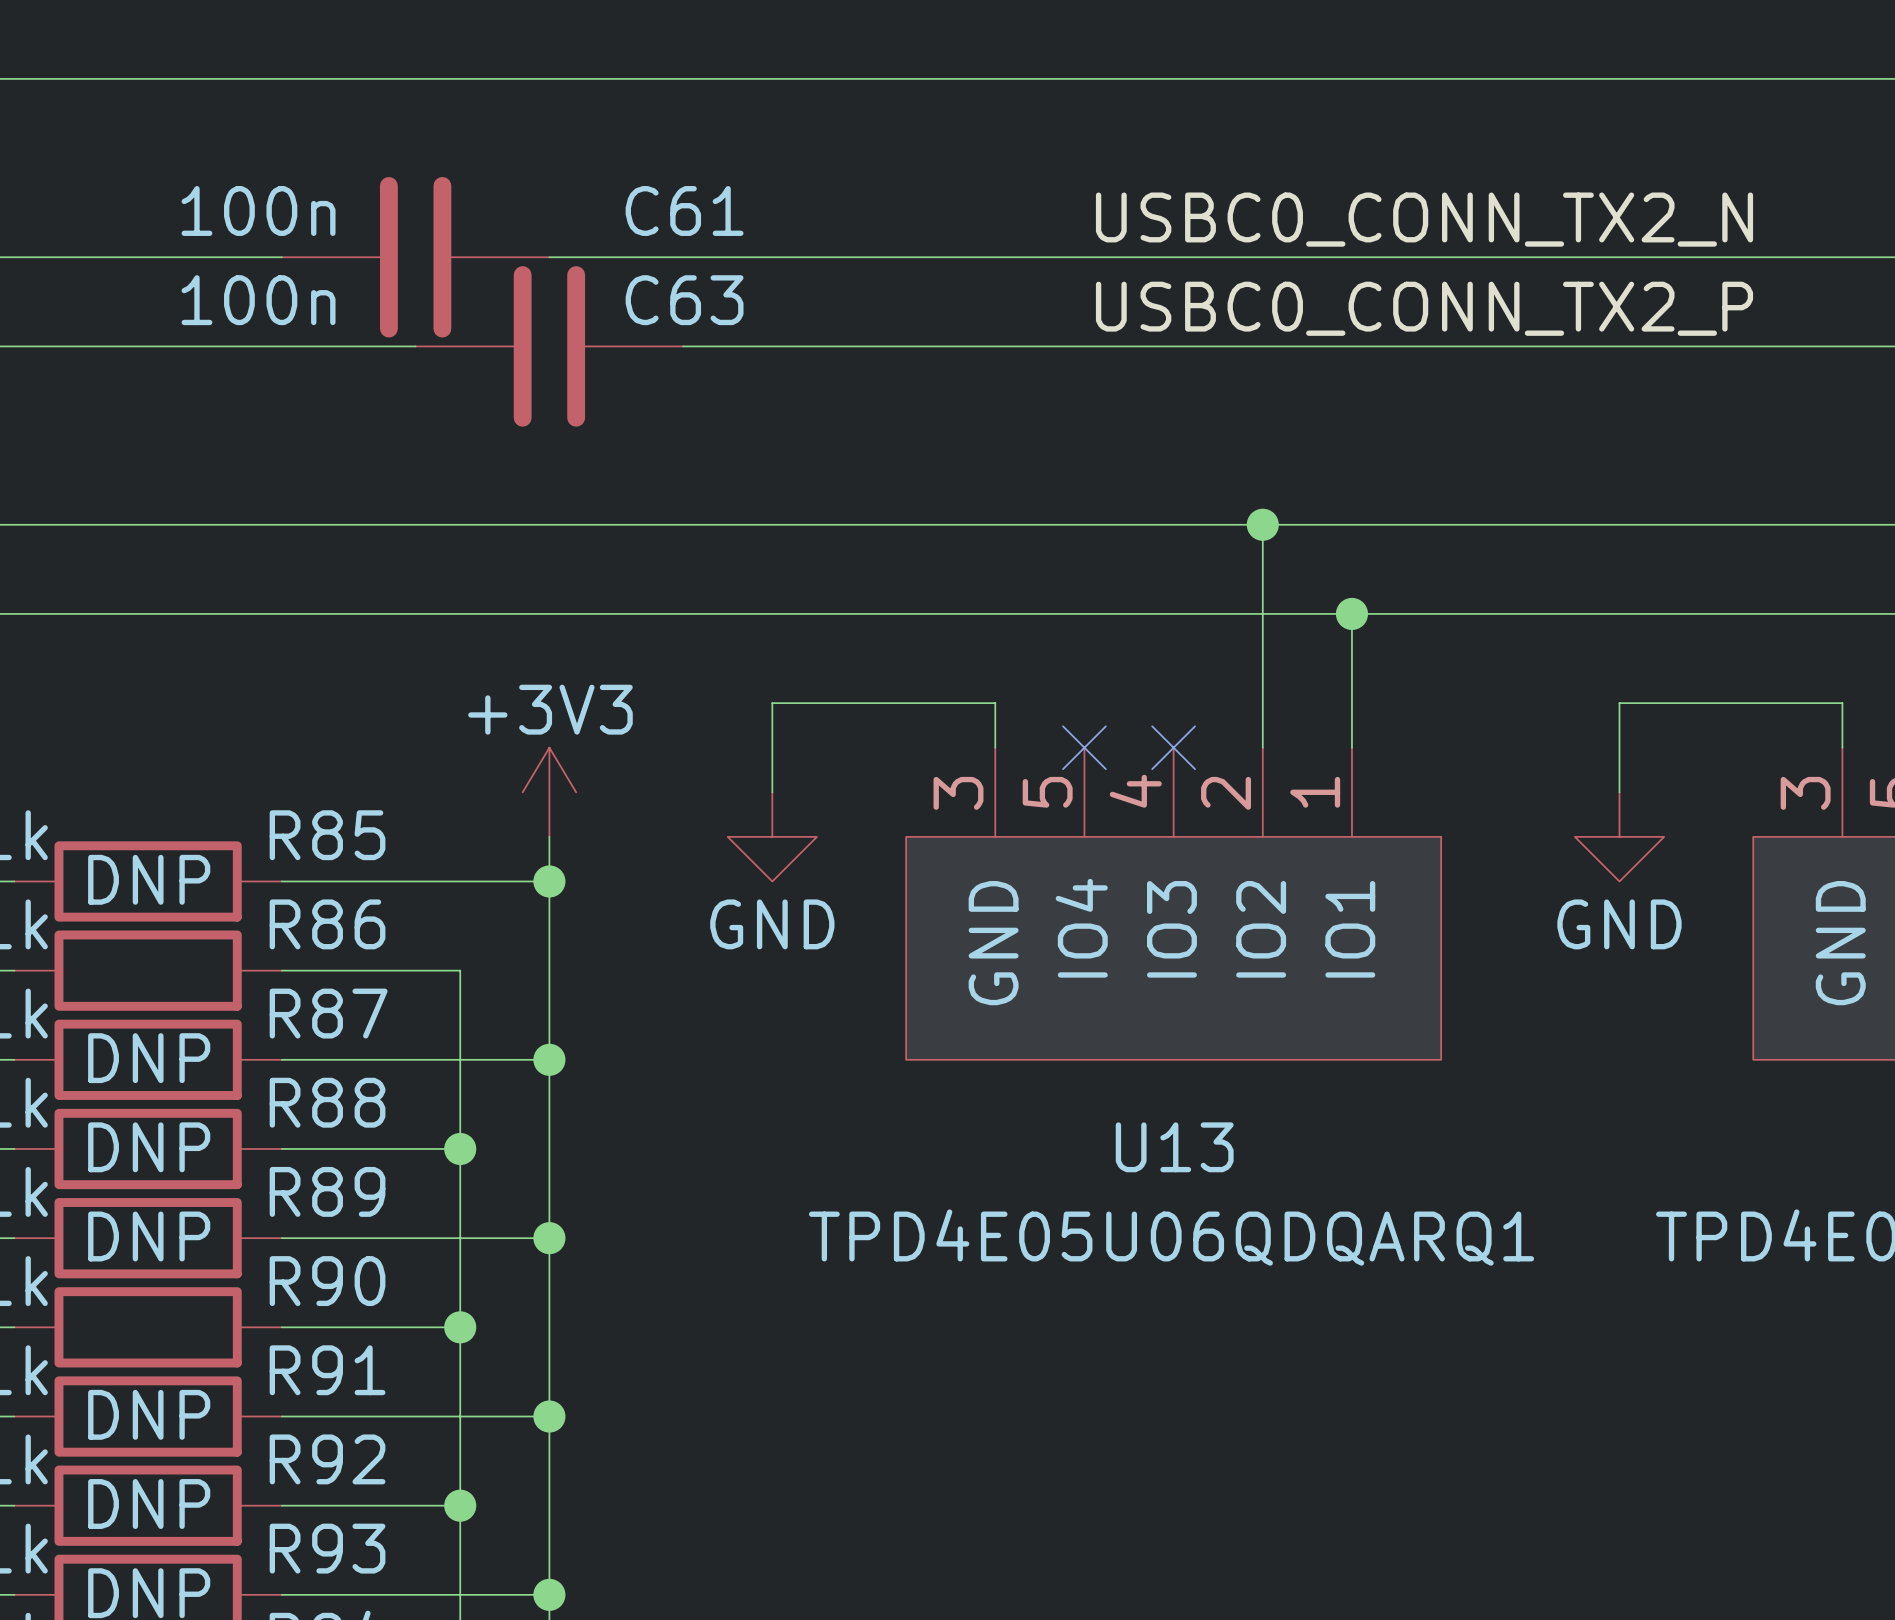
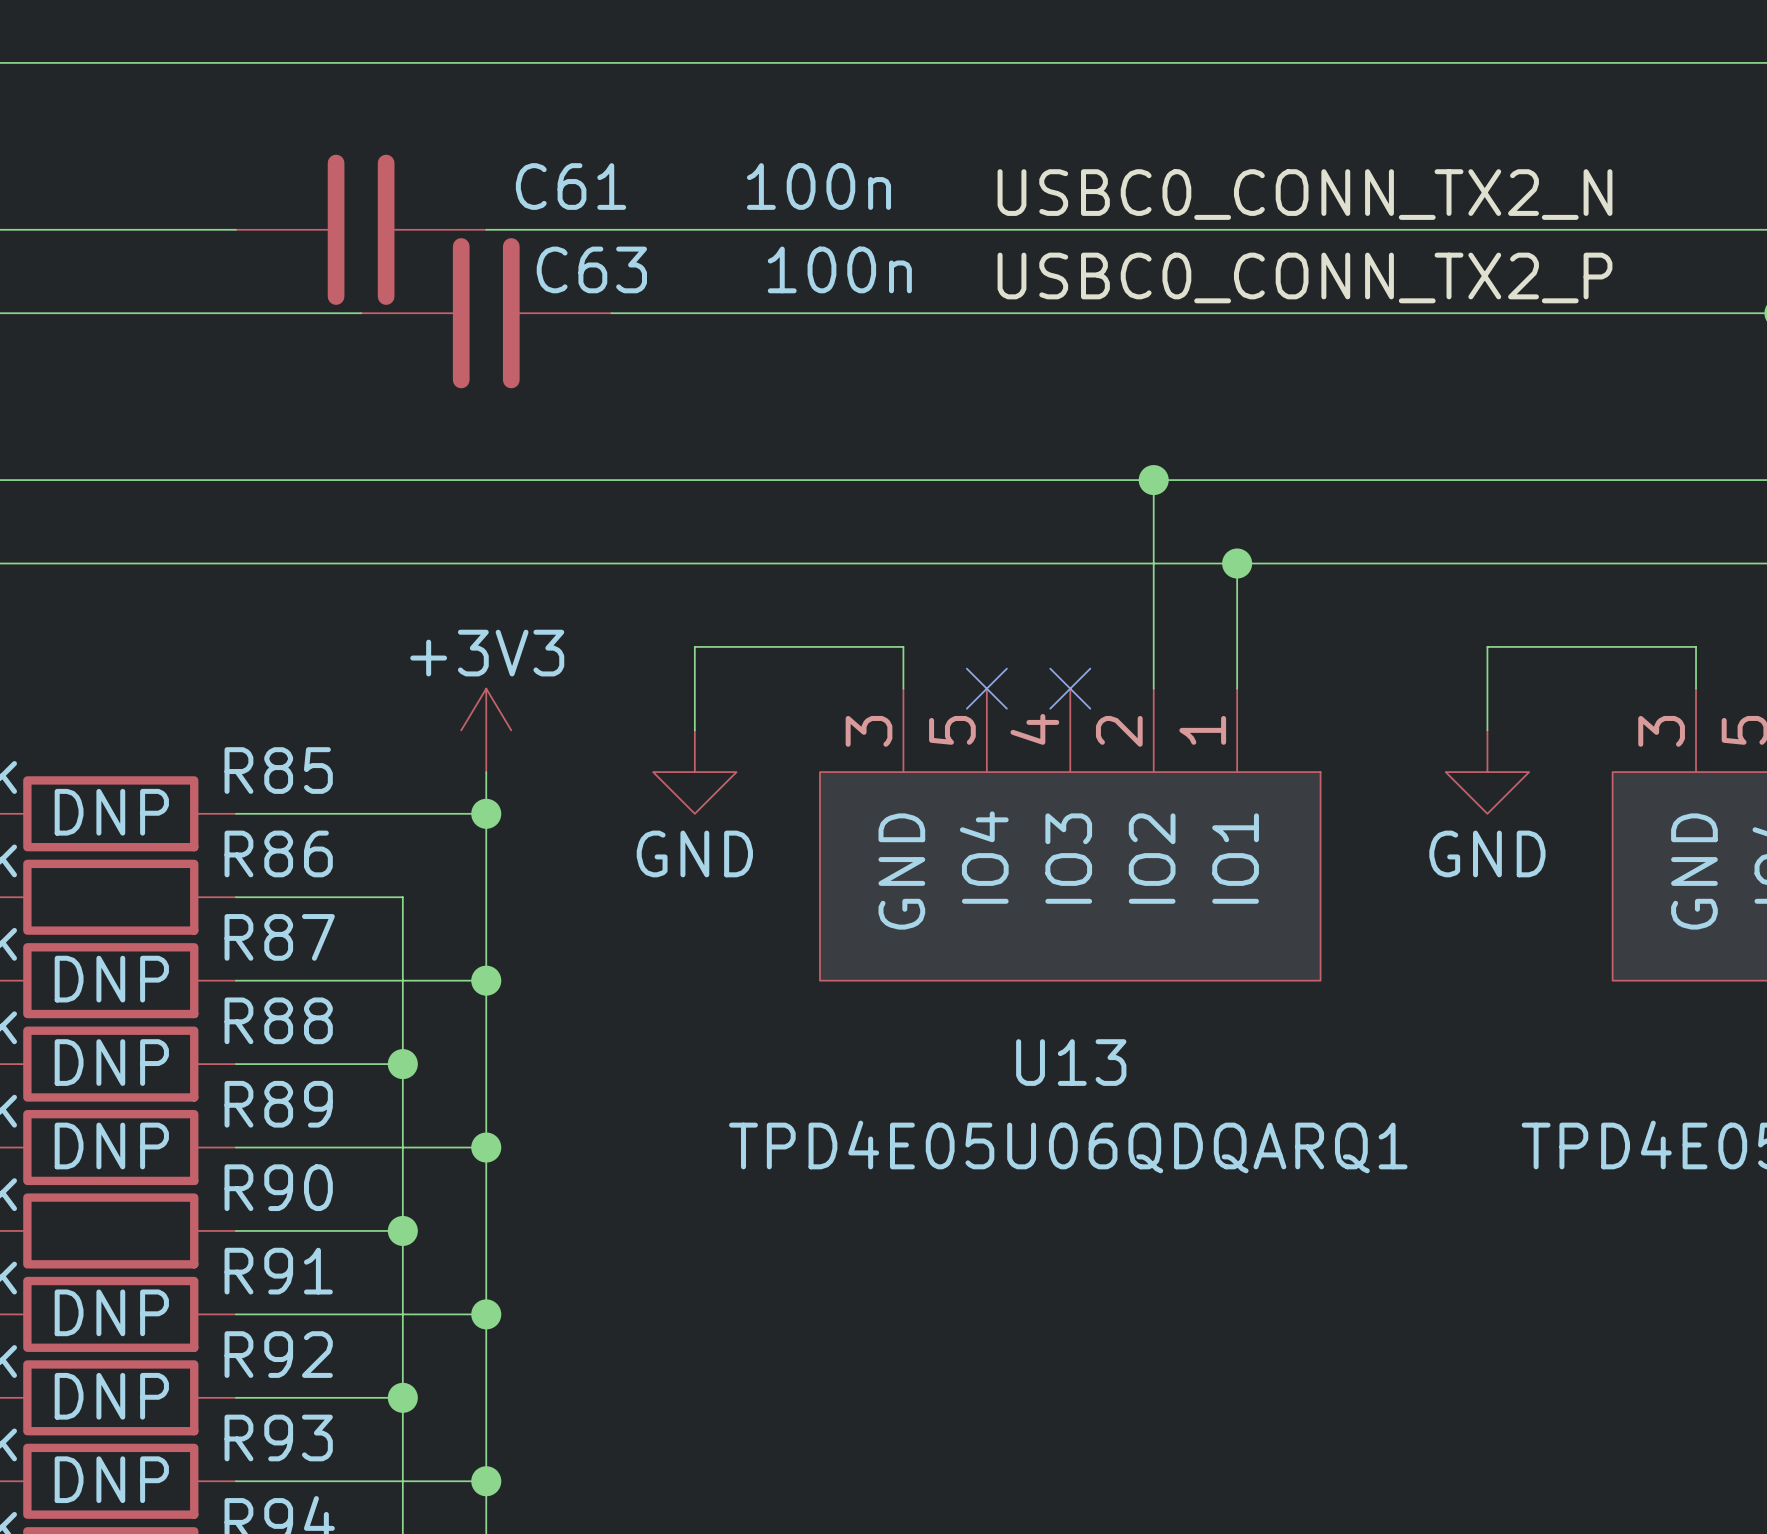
C61 text position: 100n (258, 211) -> 100n (818, 186)
C61 name position: C61 (684, 211) -> C61 (571, 186)
C63 text position: 100n (258, 300) -> 100n (839, 269)
C63 name position: C63 (684, 300) -> C63 (591, 269)

